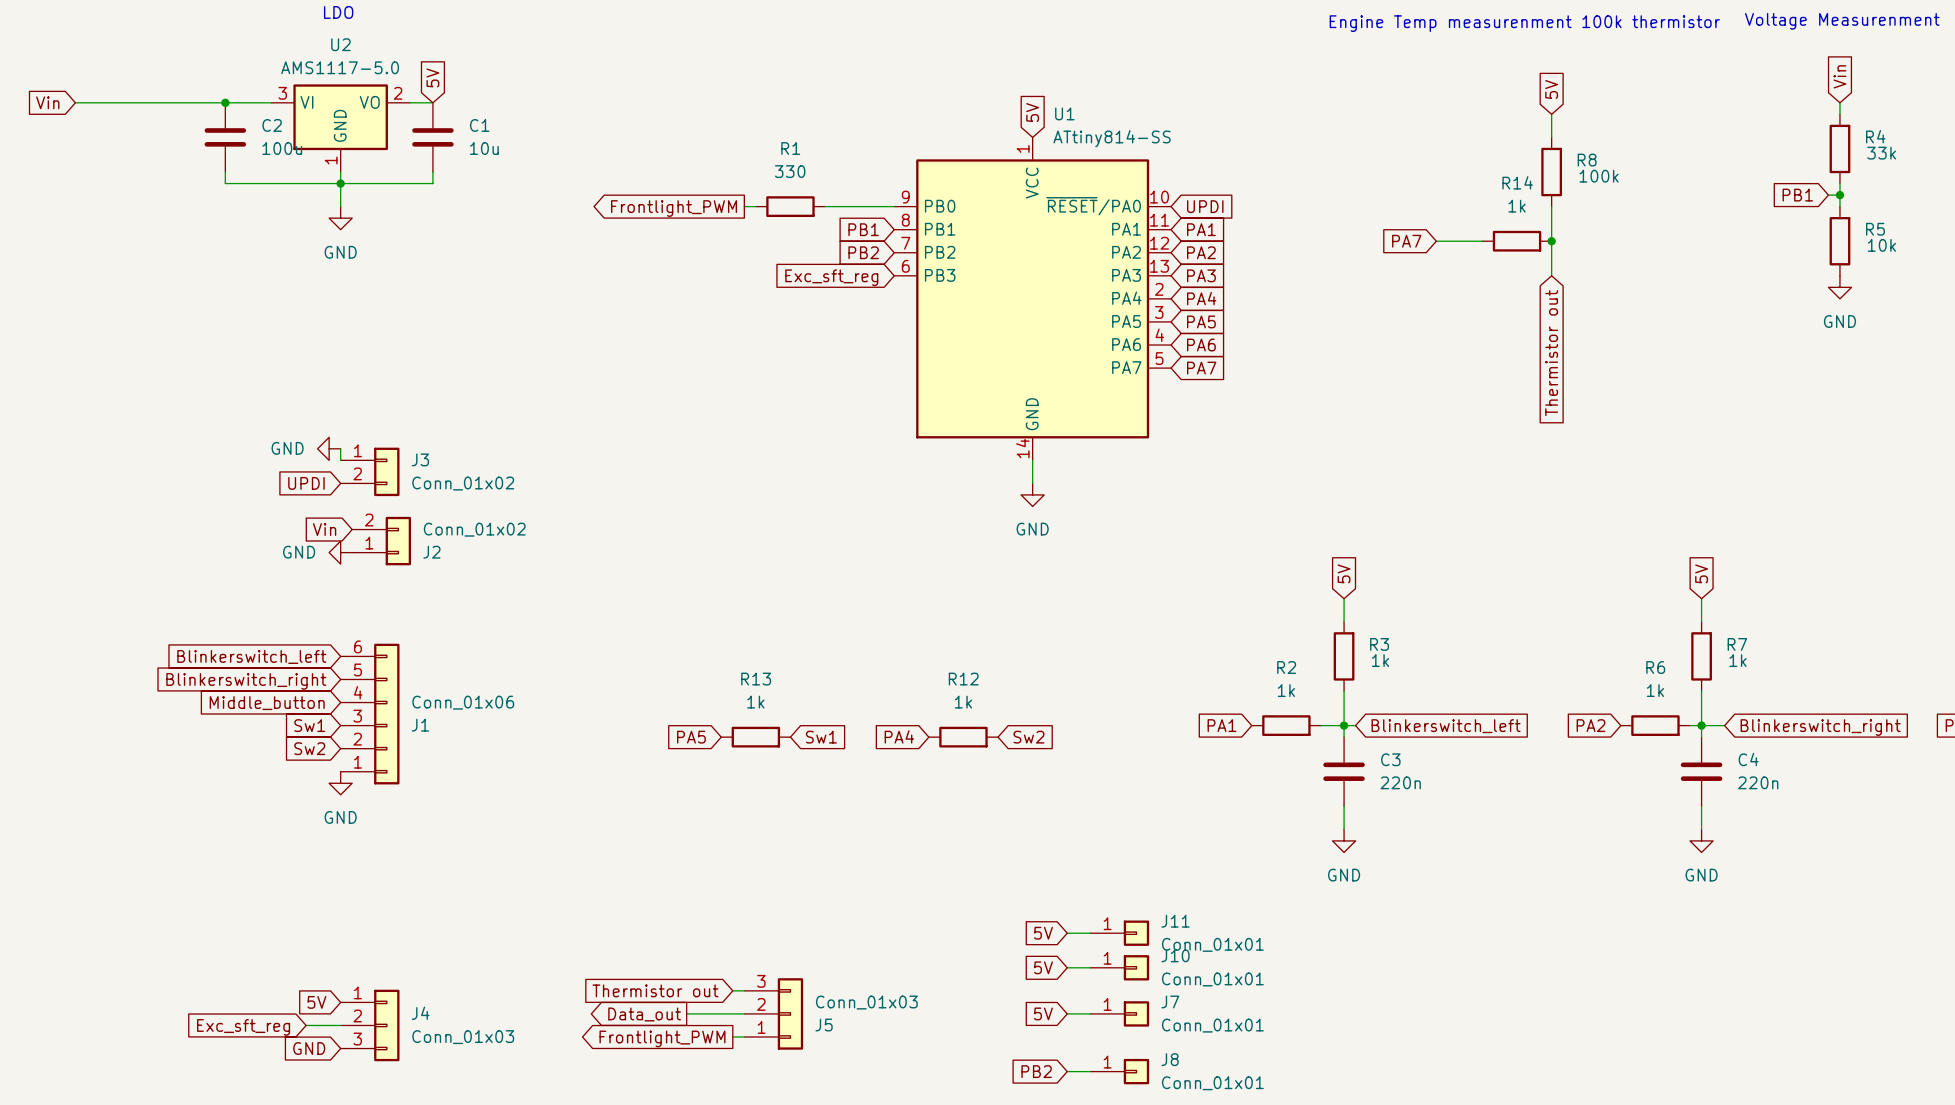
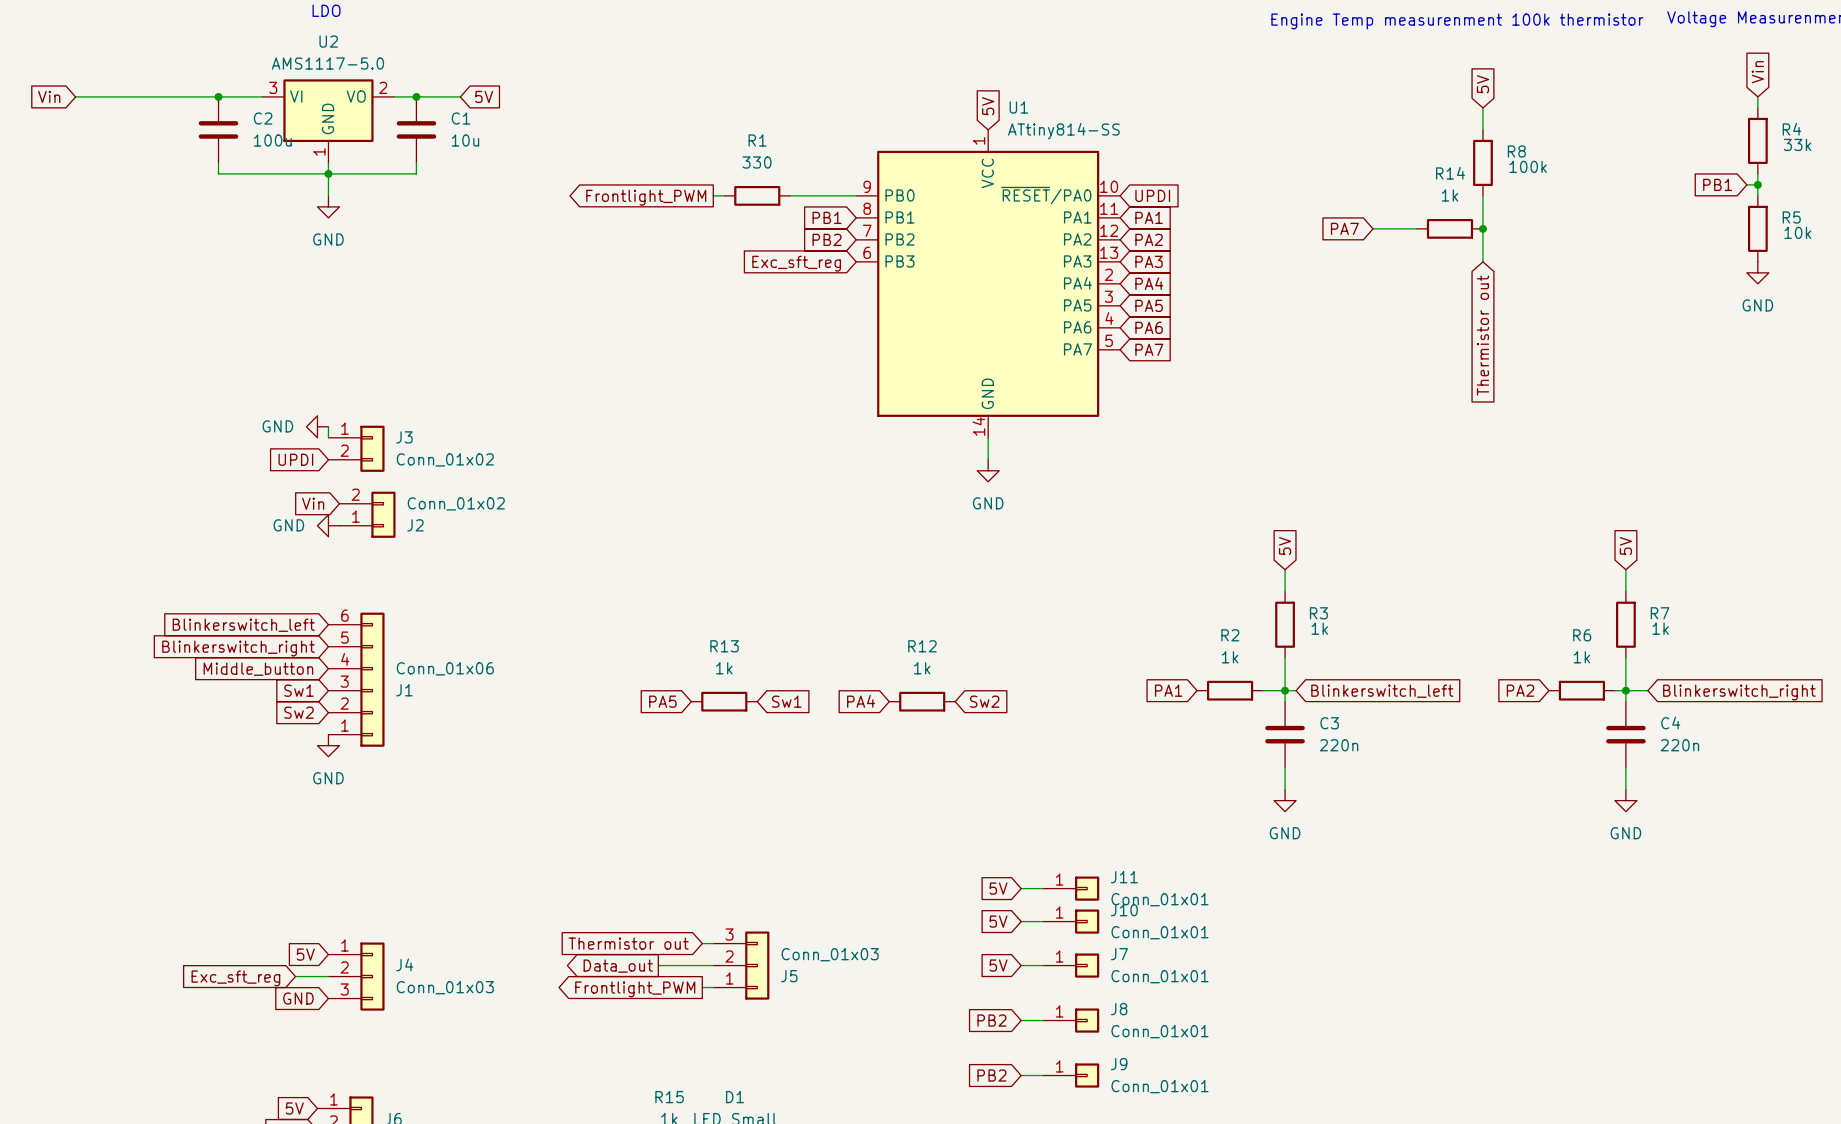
global label rotation: 0° (432, 77) -> 90° clockwise (484, 96)
global label position: 5V (432, 77) -> 5V (484, 96)
wire: none -> (416, 96) (460, 96)
junction: none -> (416, 96)

